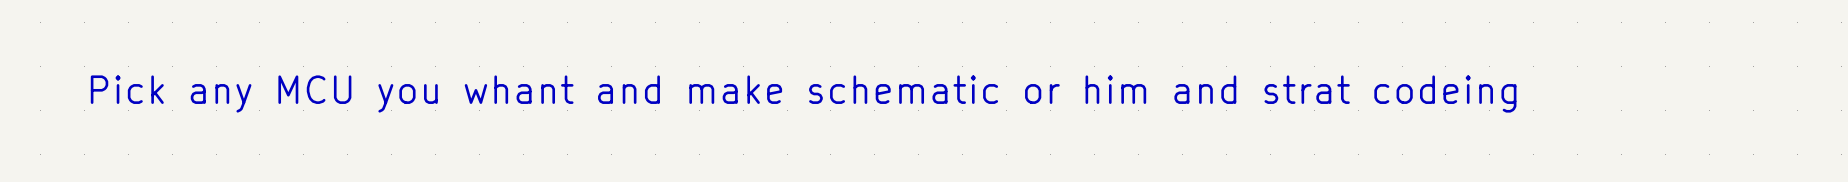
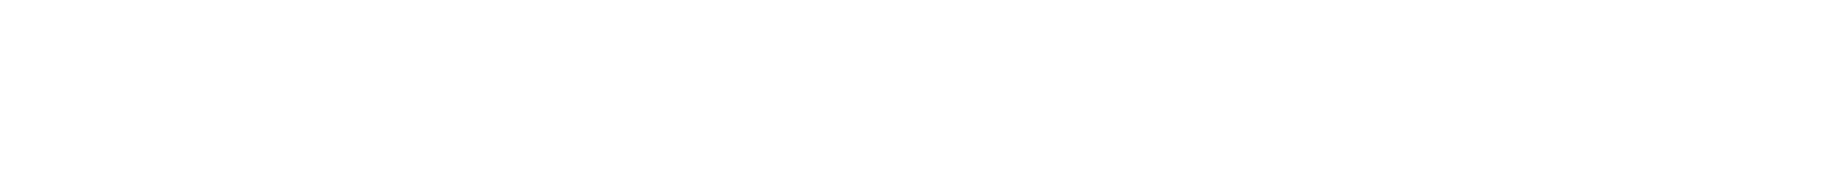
text: Pick any MCU you whant and make schematic or him and strat codeing (803, 94) -> none

